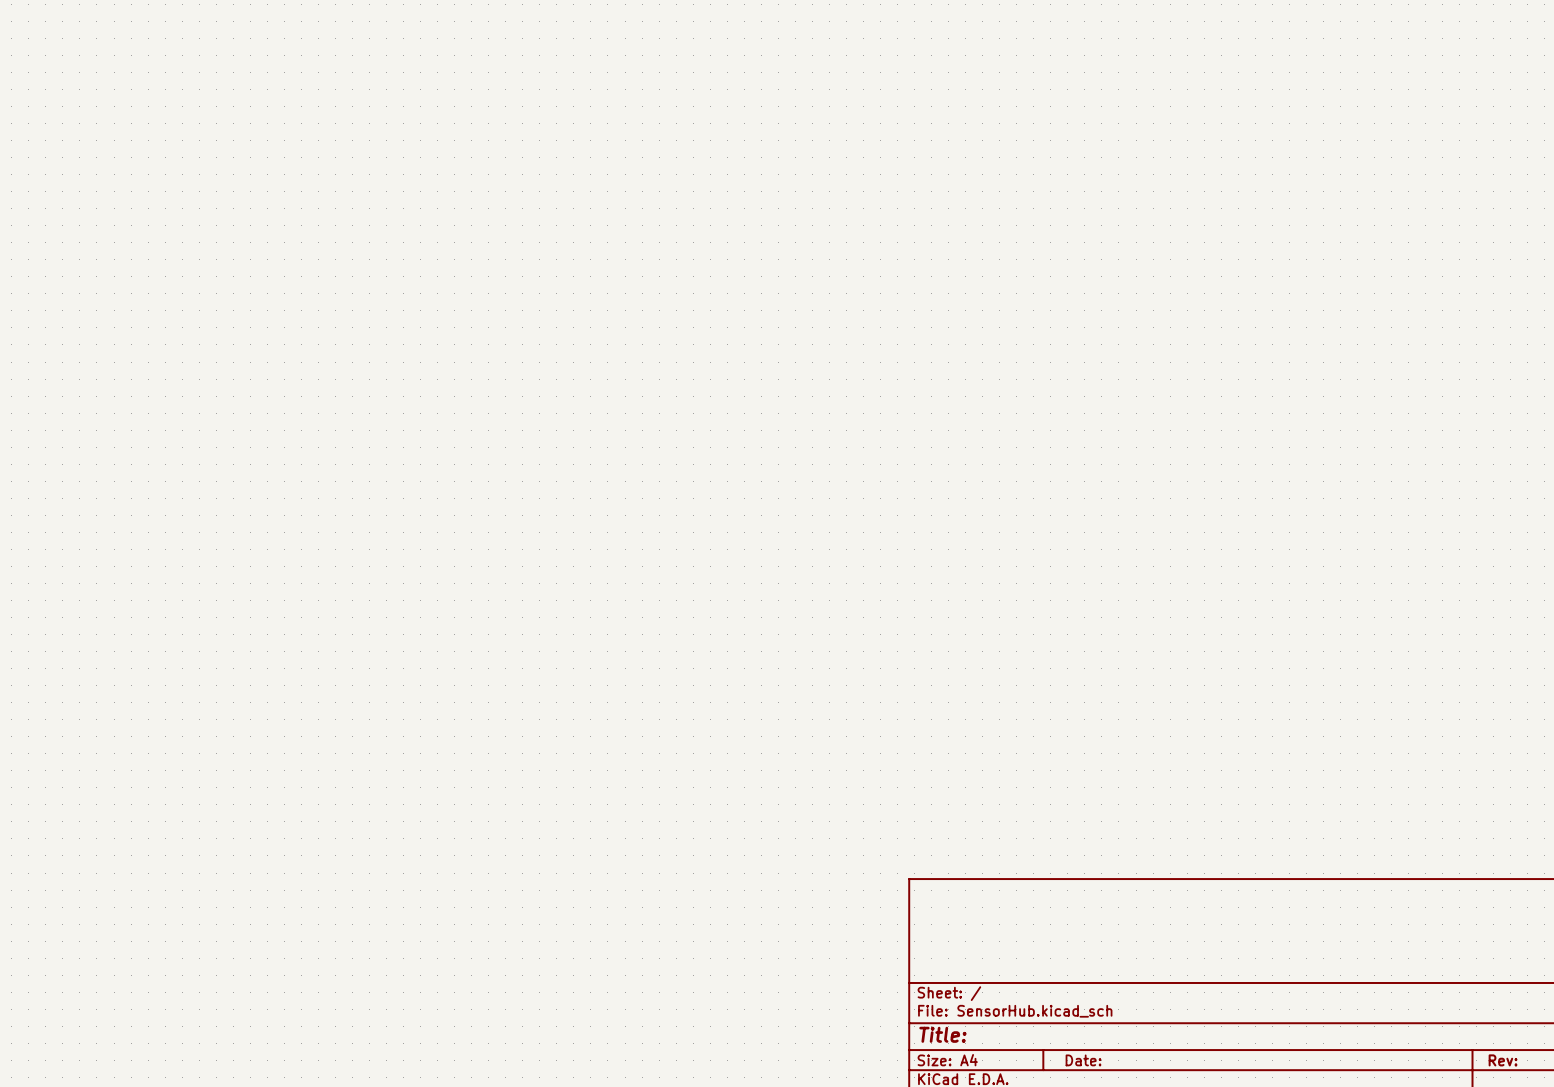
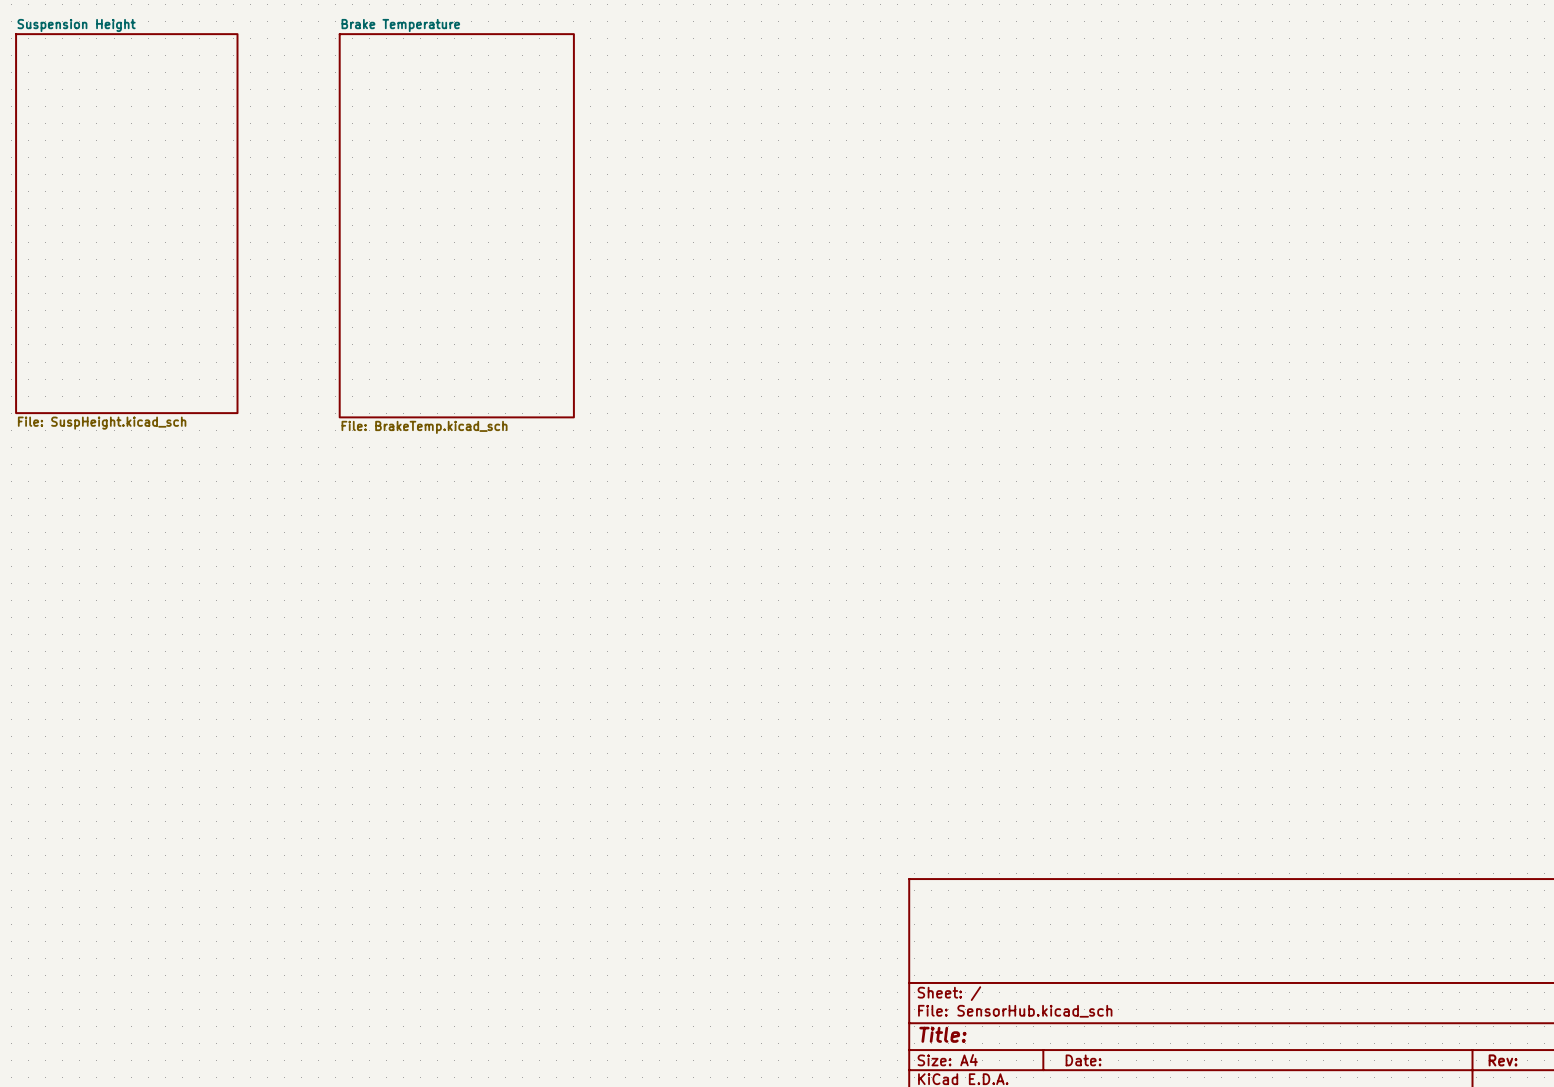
sheet Suspension Height: none -> File: SuspHeight.kicad_sch (126, 223)
sheet Brake Temperature: none -> File: BrakeTemp.kicad_sch (456, 225)

